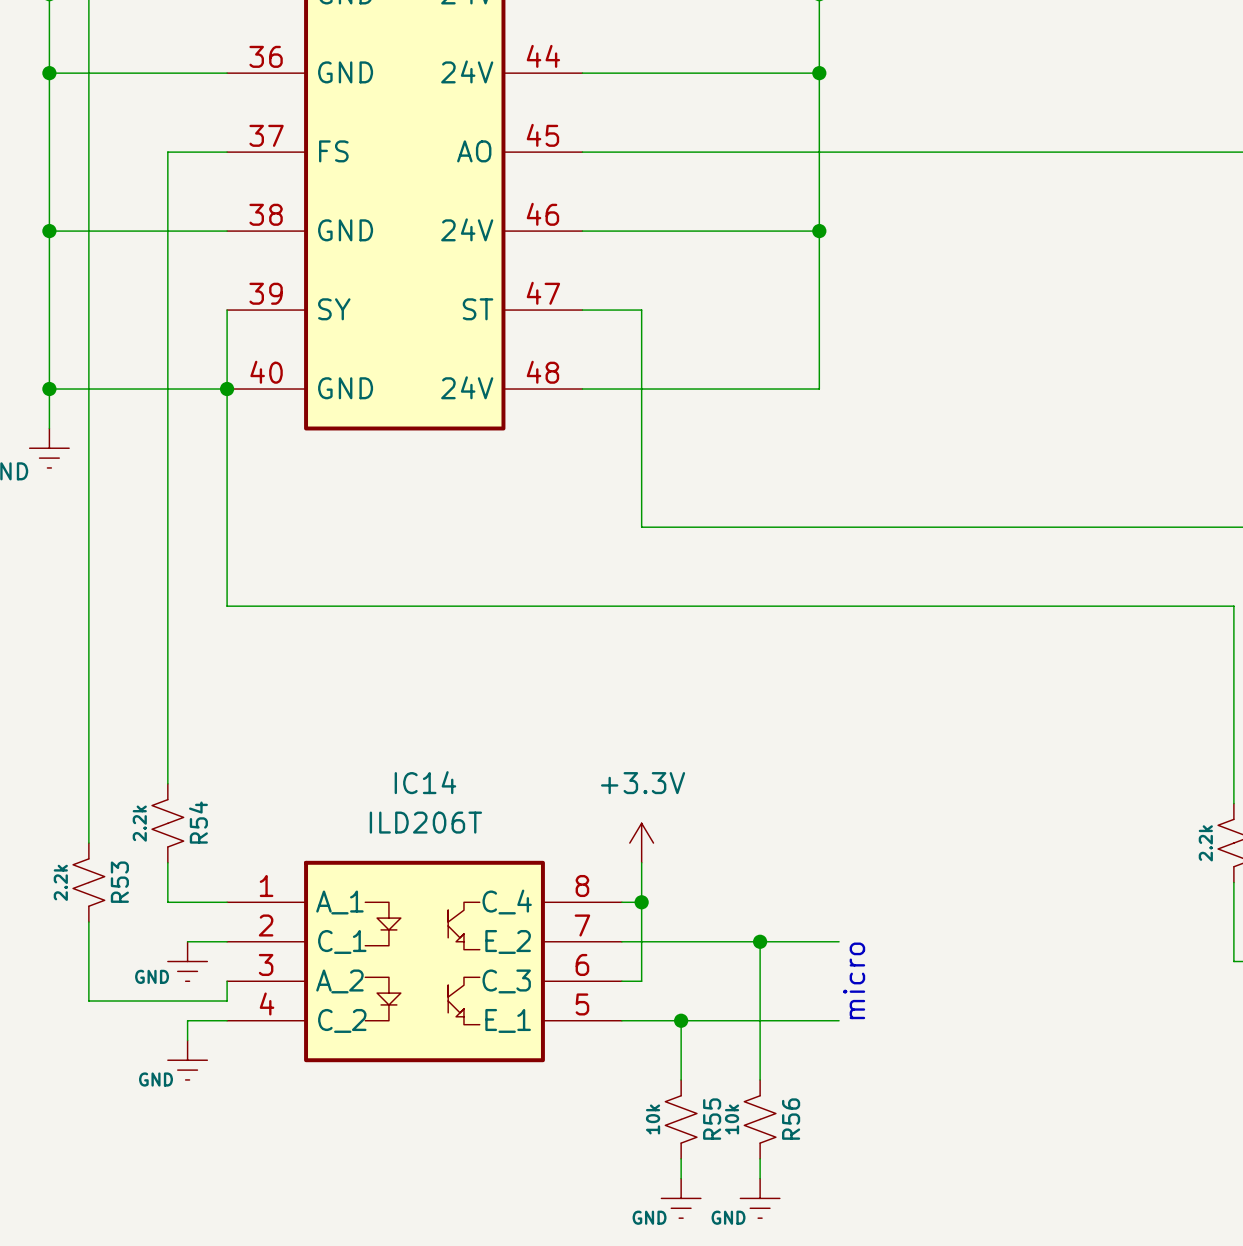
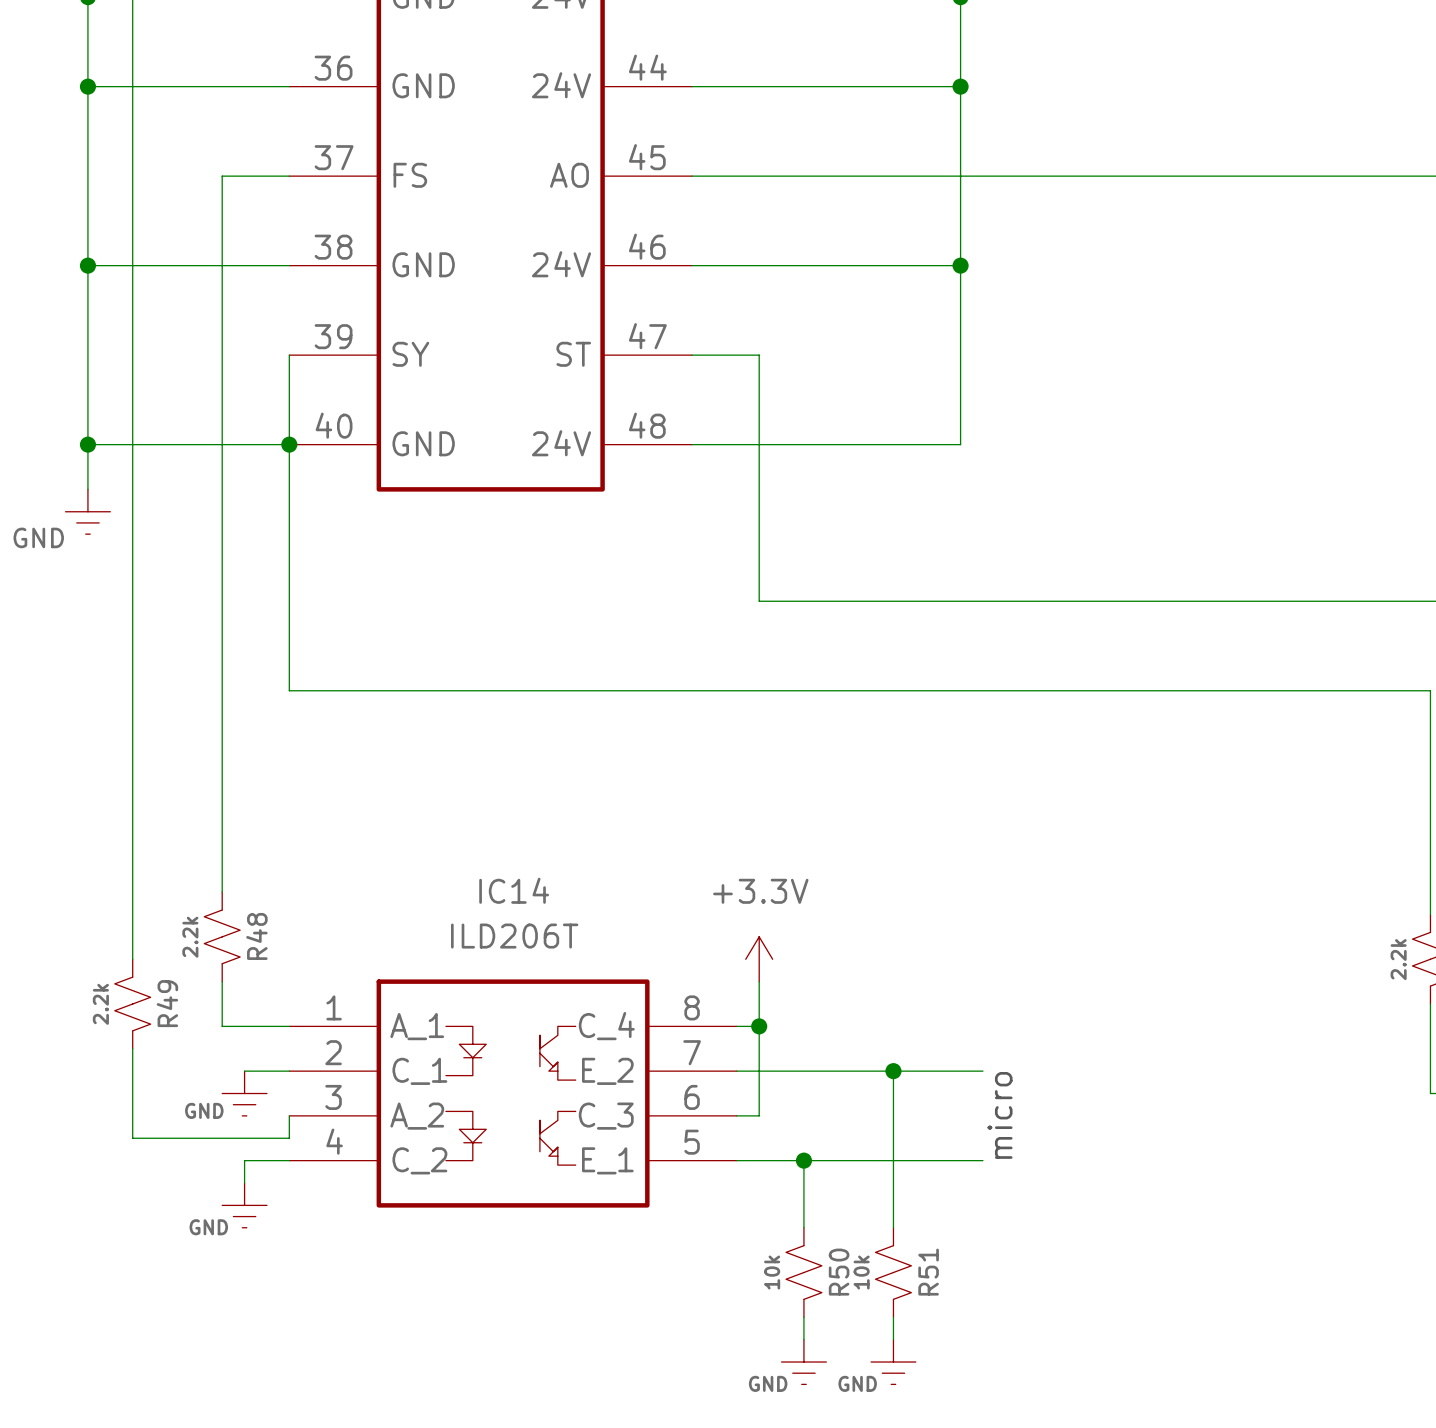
R54 name: R54 (198, 822) -> R48 (256, 936)
R53 name: R53 (119, 882) -> R49 (167, 1003)
R55 name: R55 (712, 1119) -> R50 (839, 1272)
R56 name: R56 (791, 1119) -> R51 (928, 1272)

